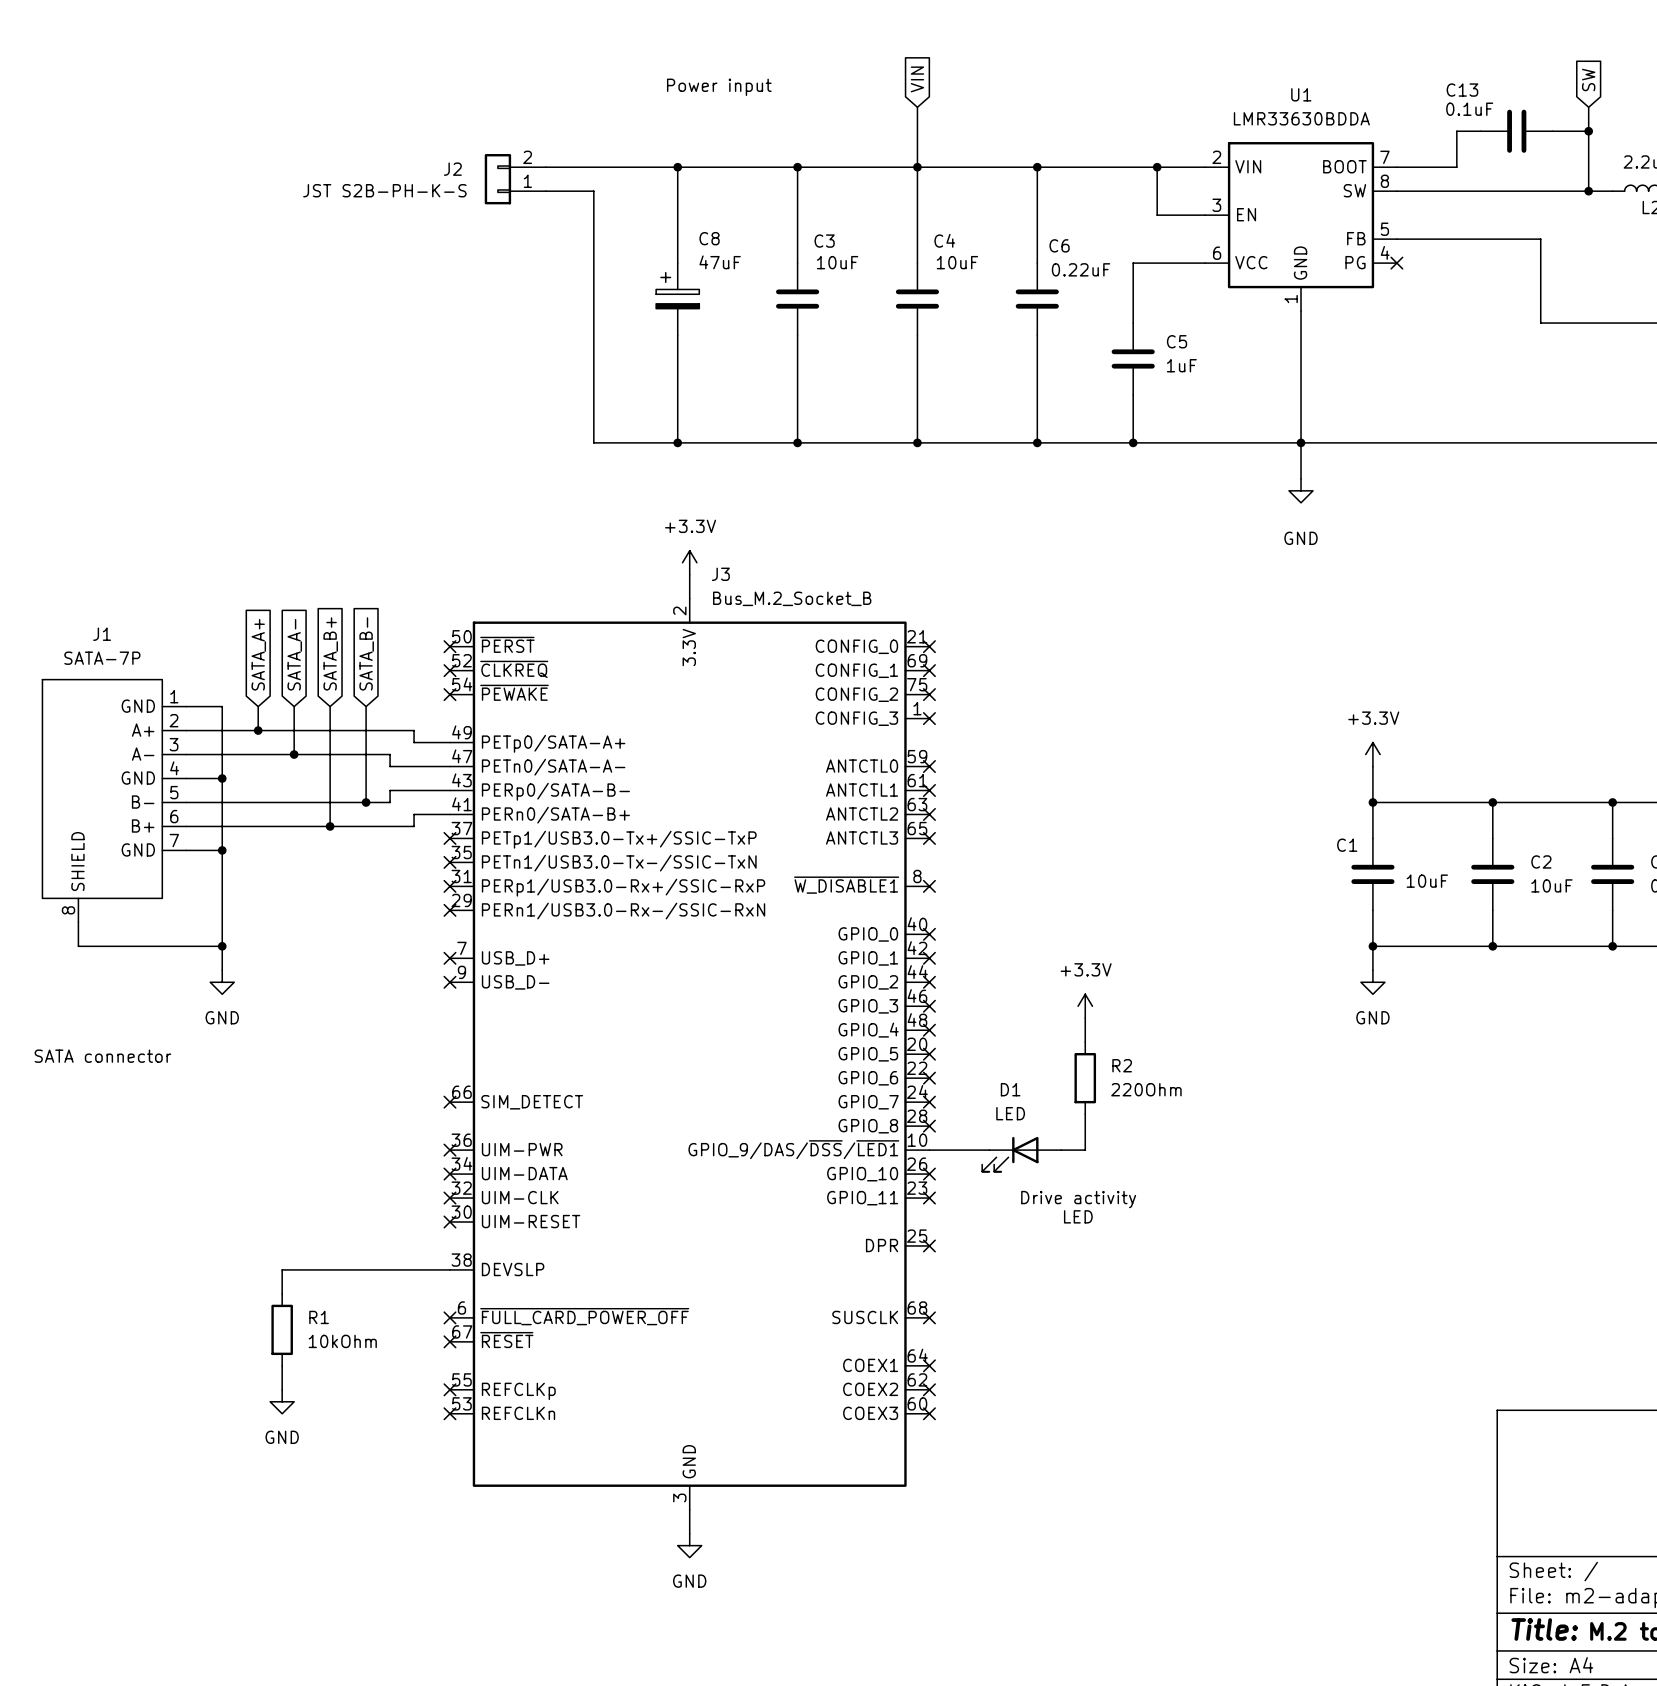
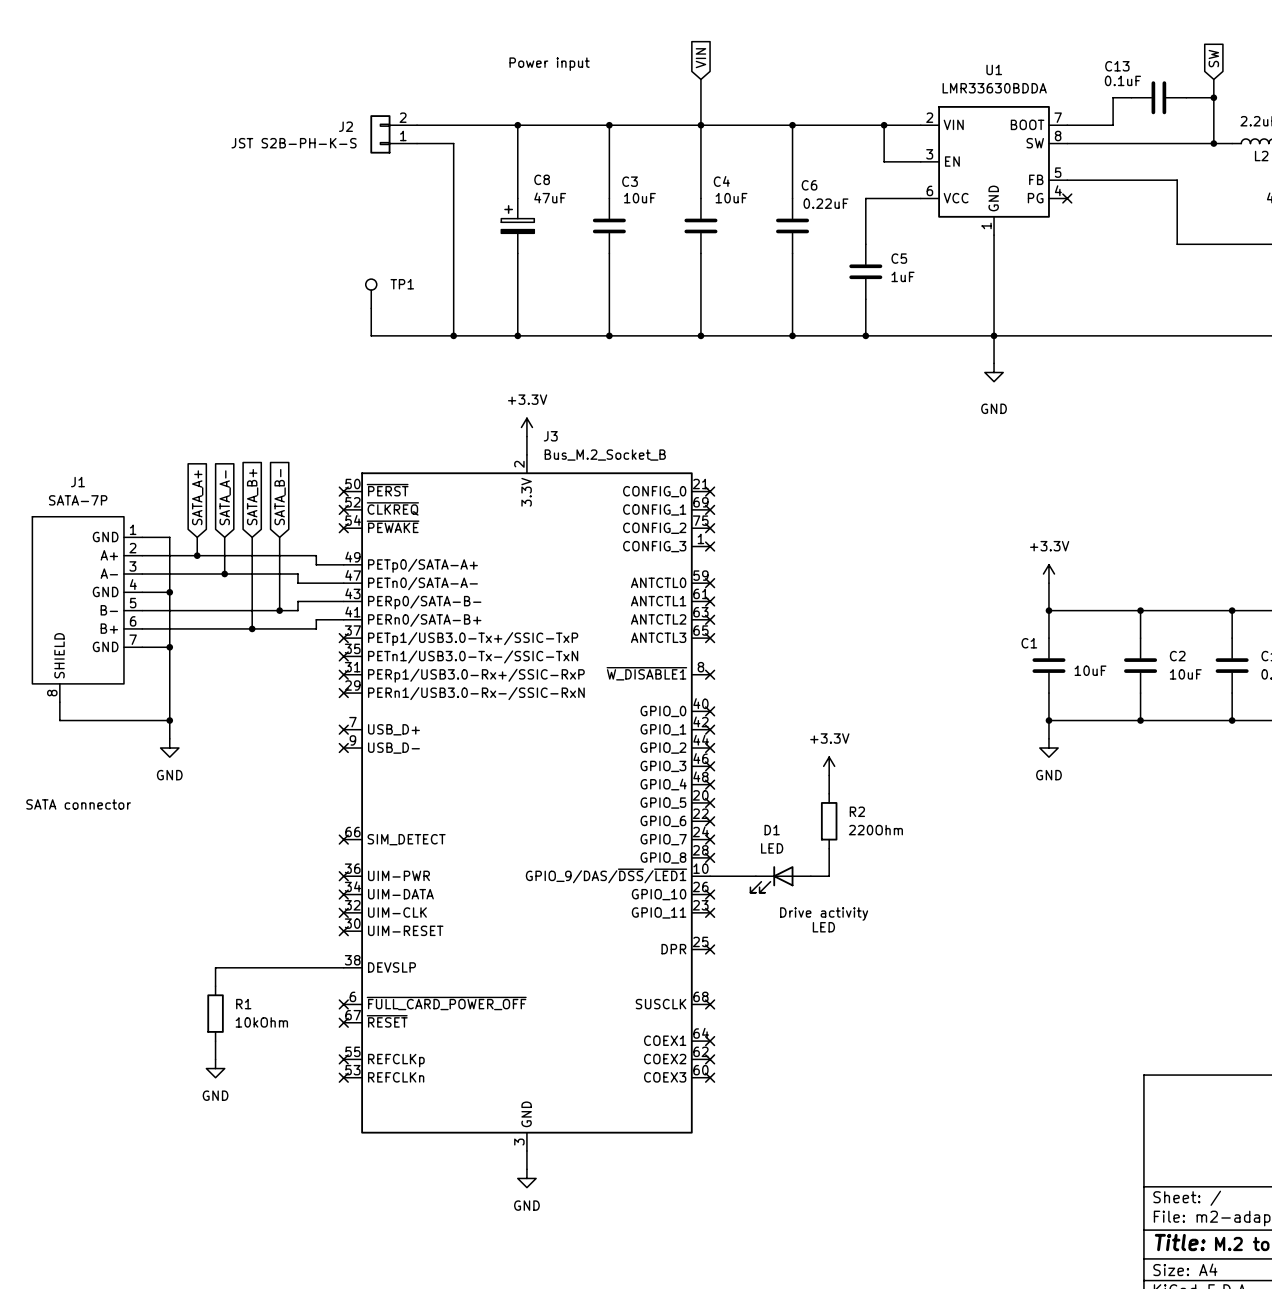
TP1: none -> (371, 293)
wire: none -> (371, 308) (371, 335) (453, 335)
junction: none -> (453, 335)

